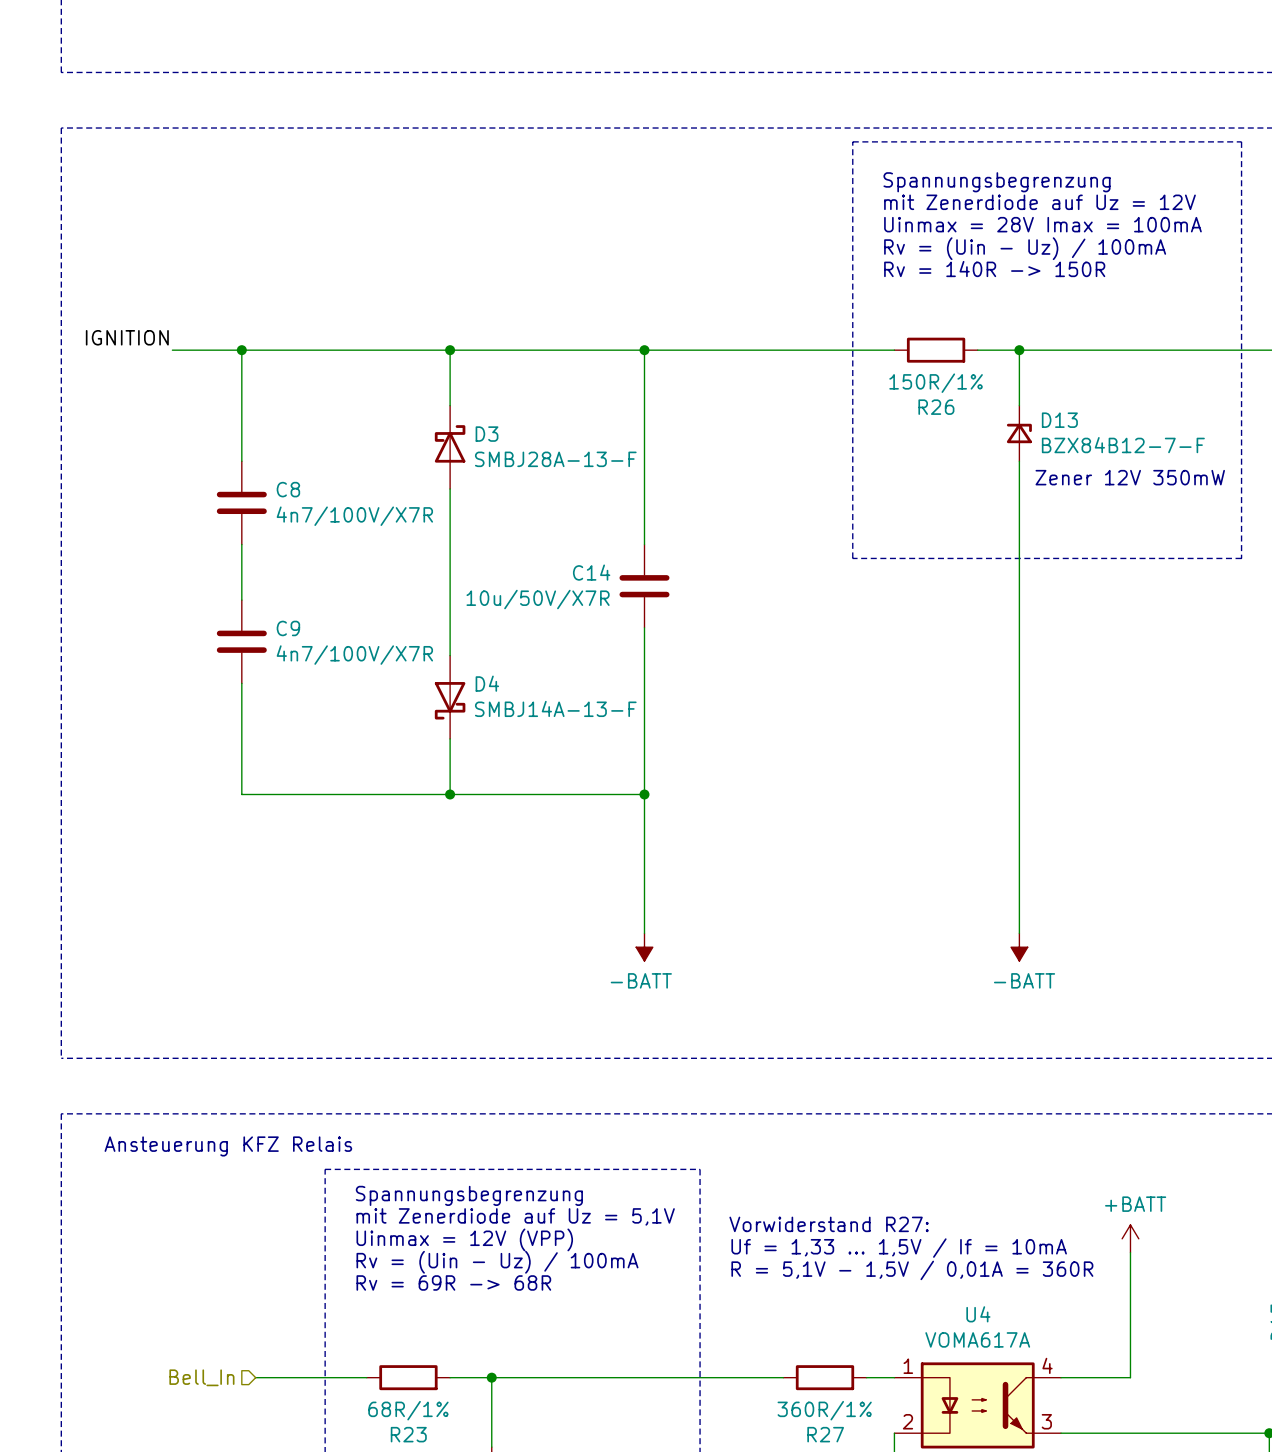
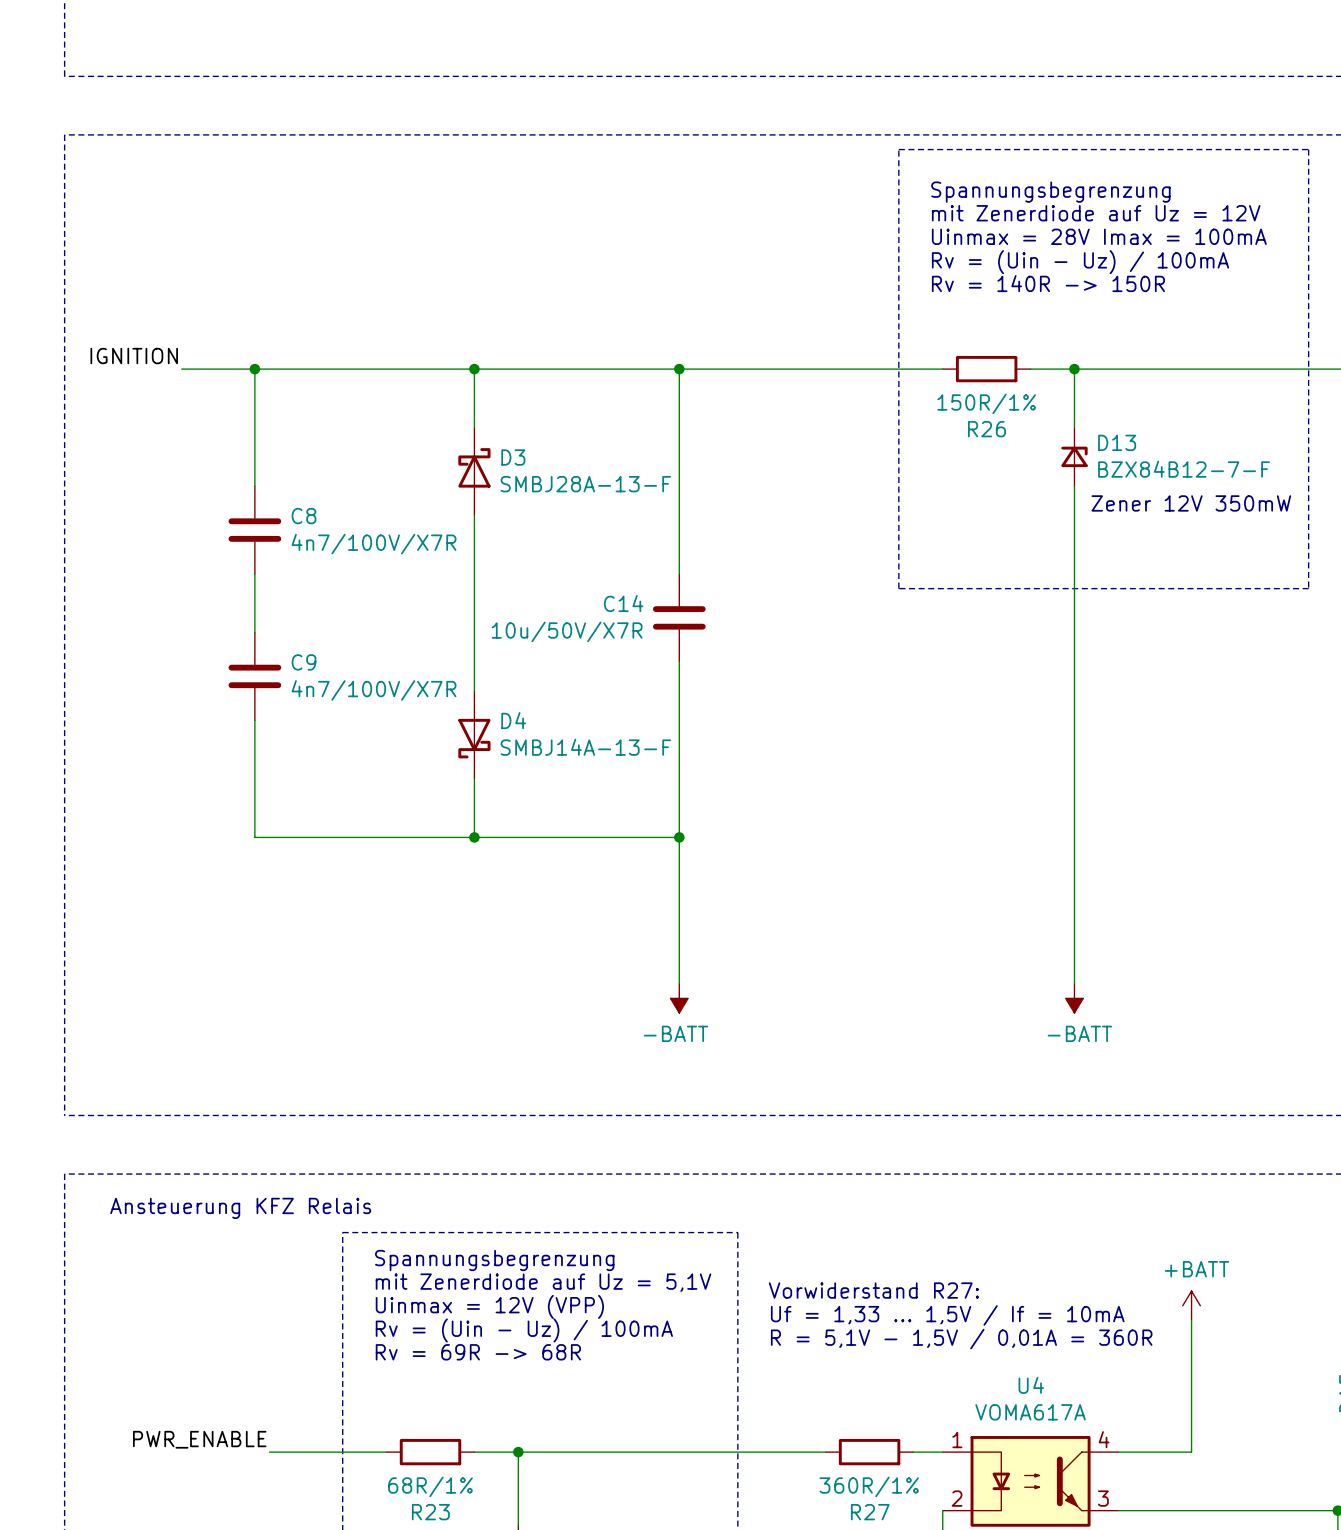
label: none -> PWR_ENABLE (199, 1439)
hierarchical label: Bell_In (201, 1377) -> none

